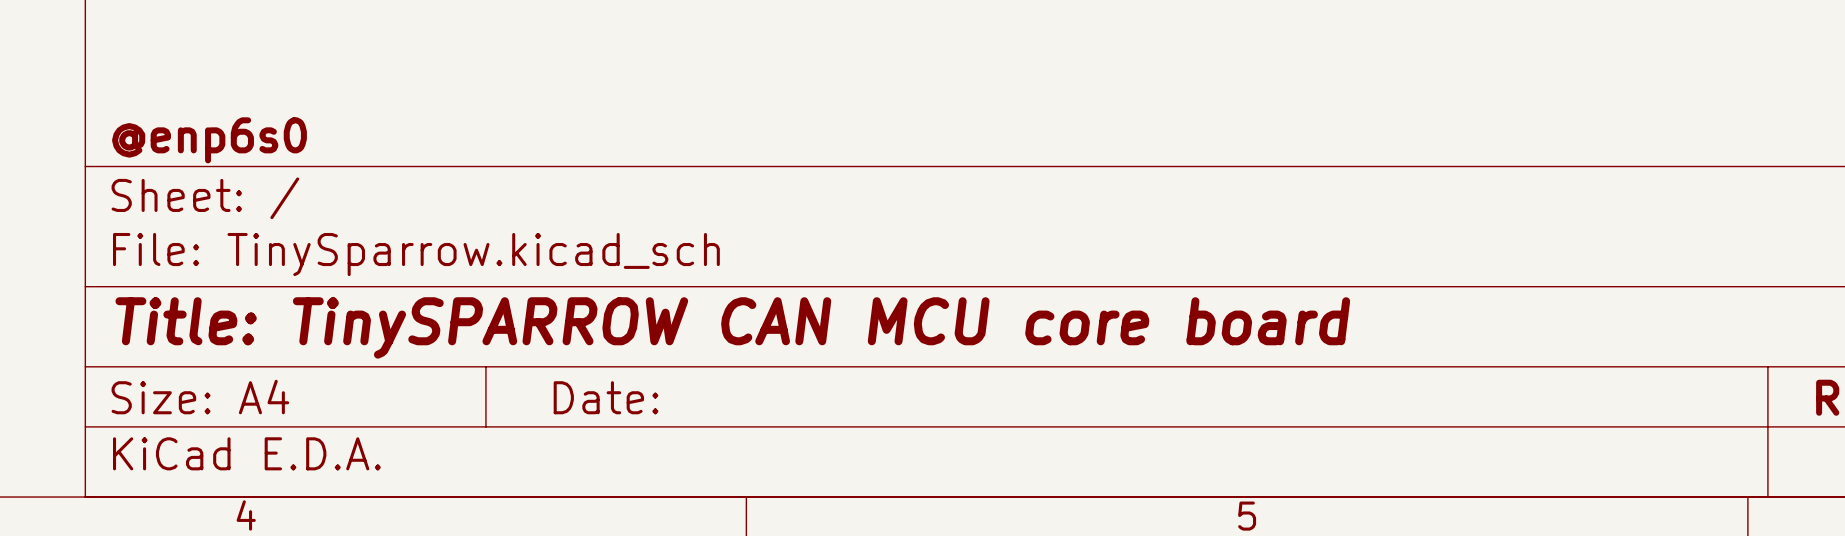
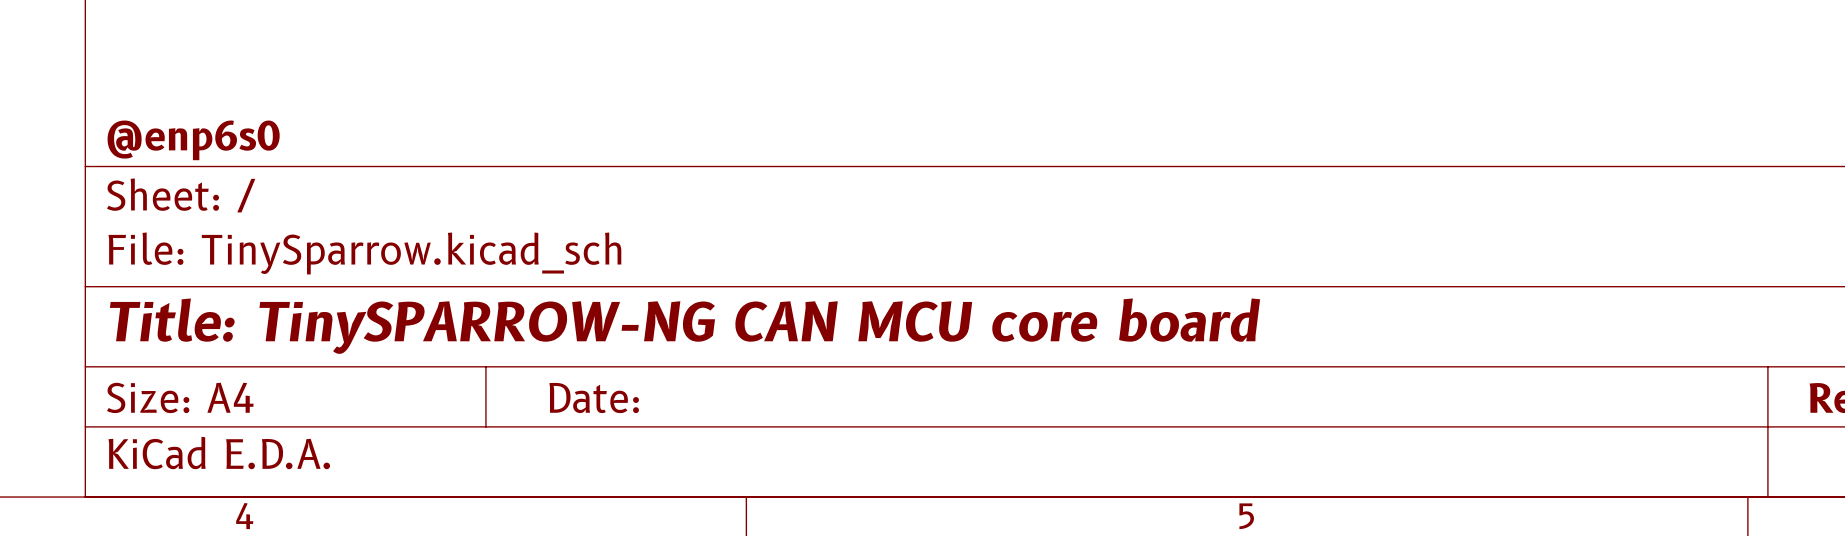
title block: Title: TinySPARROW CAN MCU core board (732, 327) -> Title: TinySPARROW-NG CAN MCU core board (685, 326)

